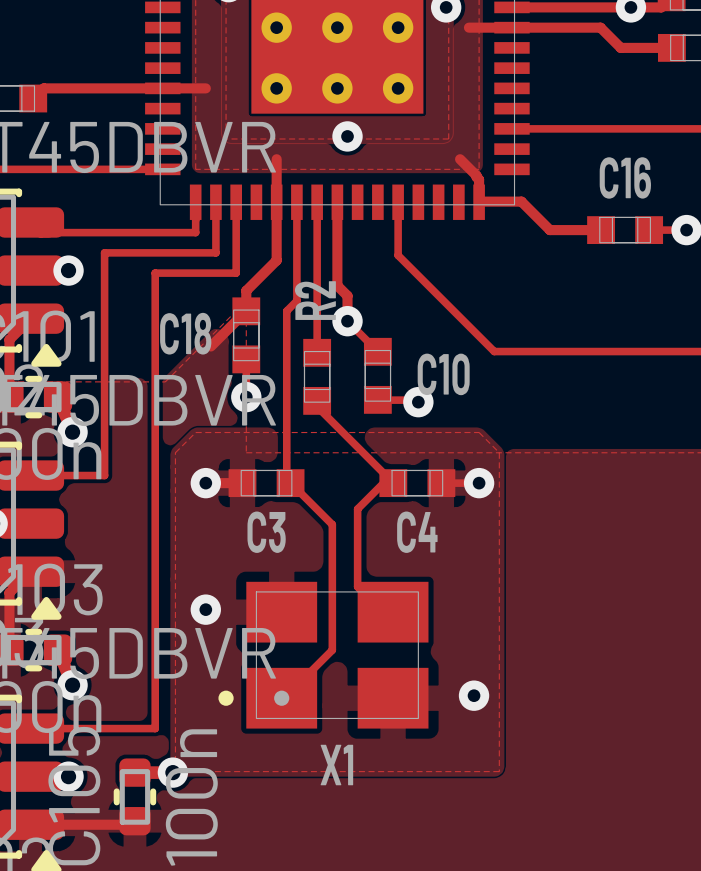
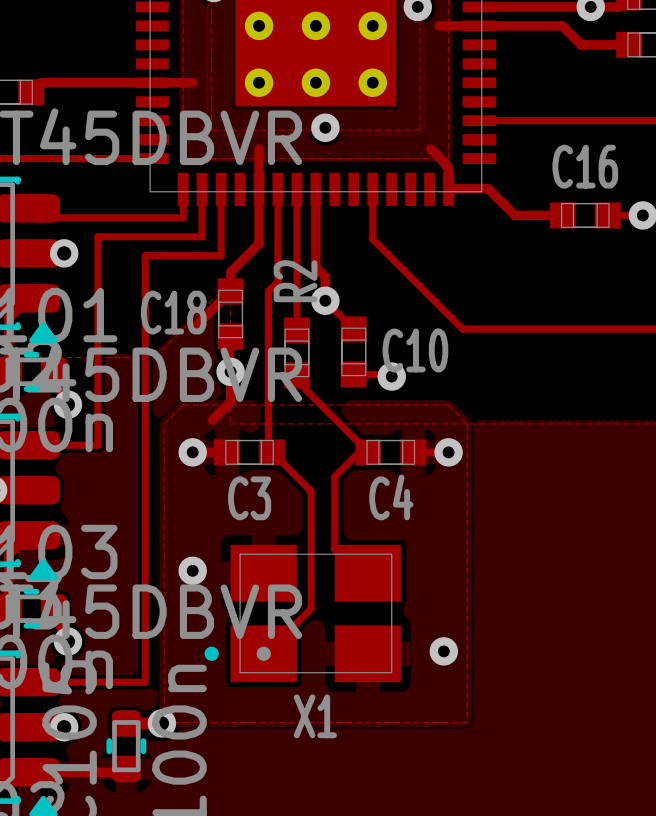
track: none -> (230, 371) (230, 402) (212, 420)

